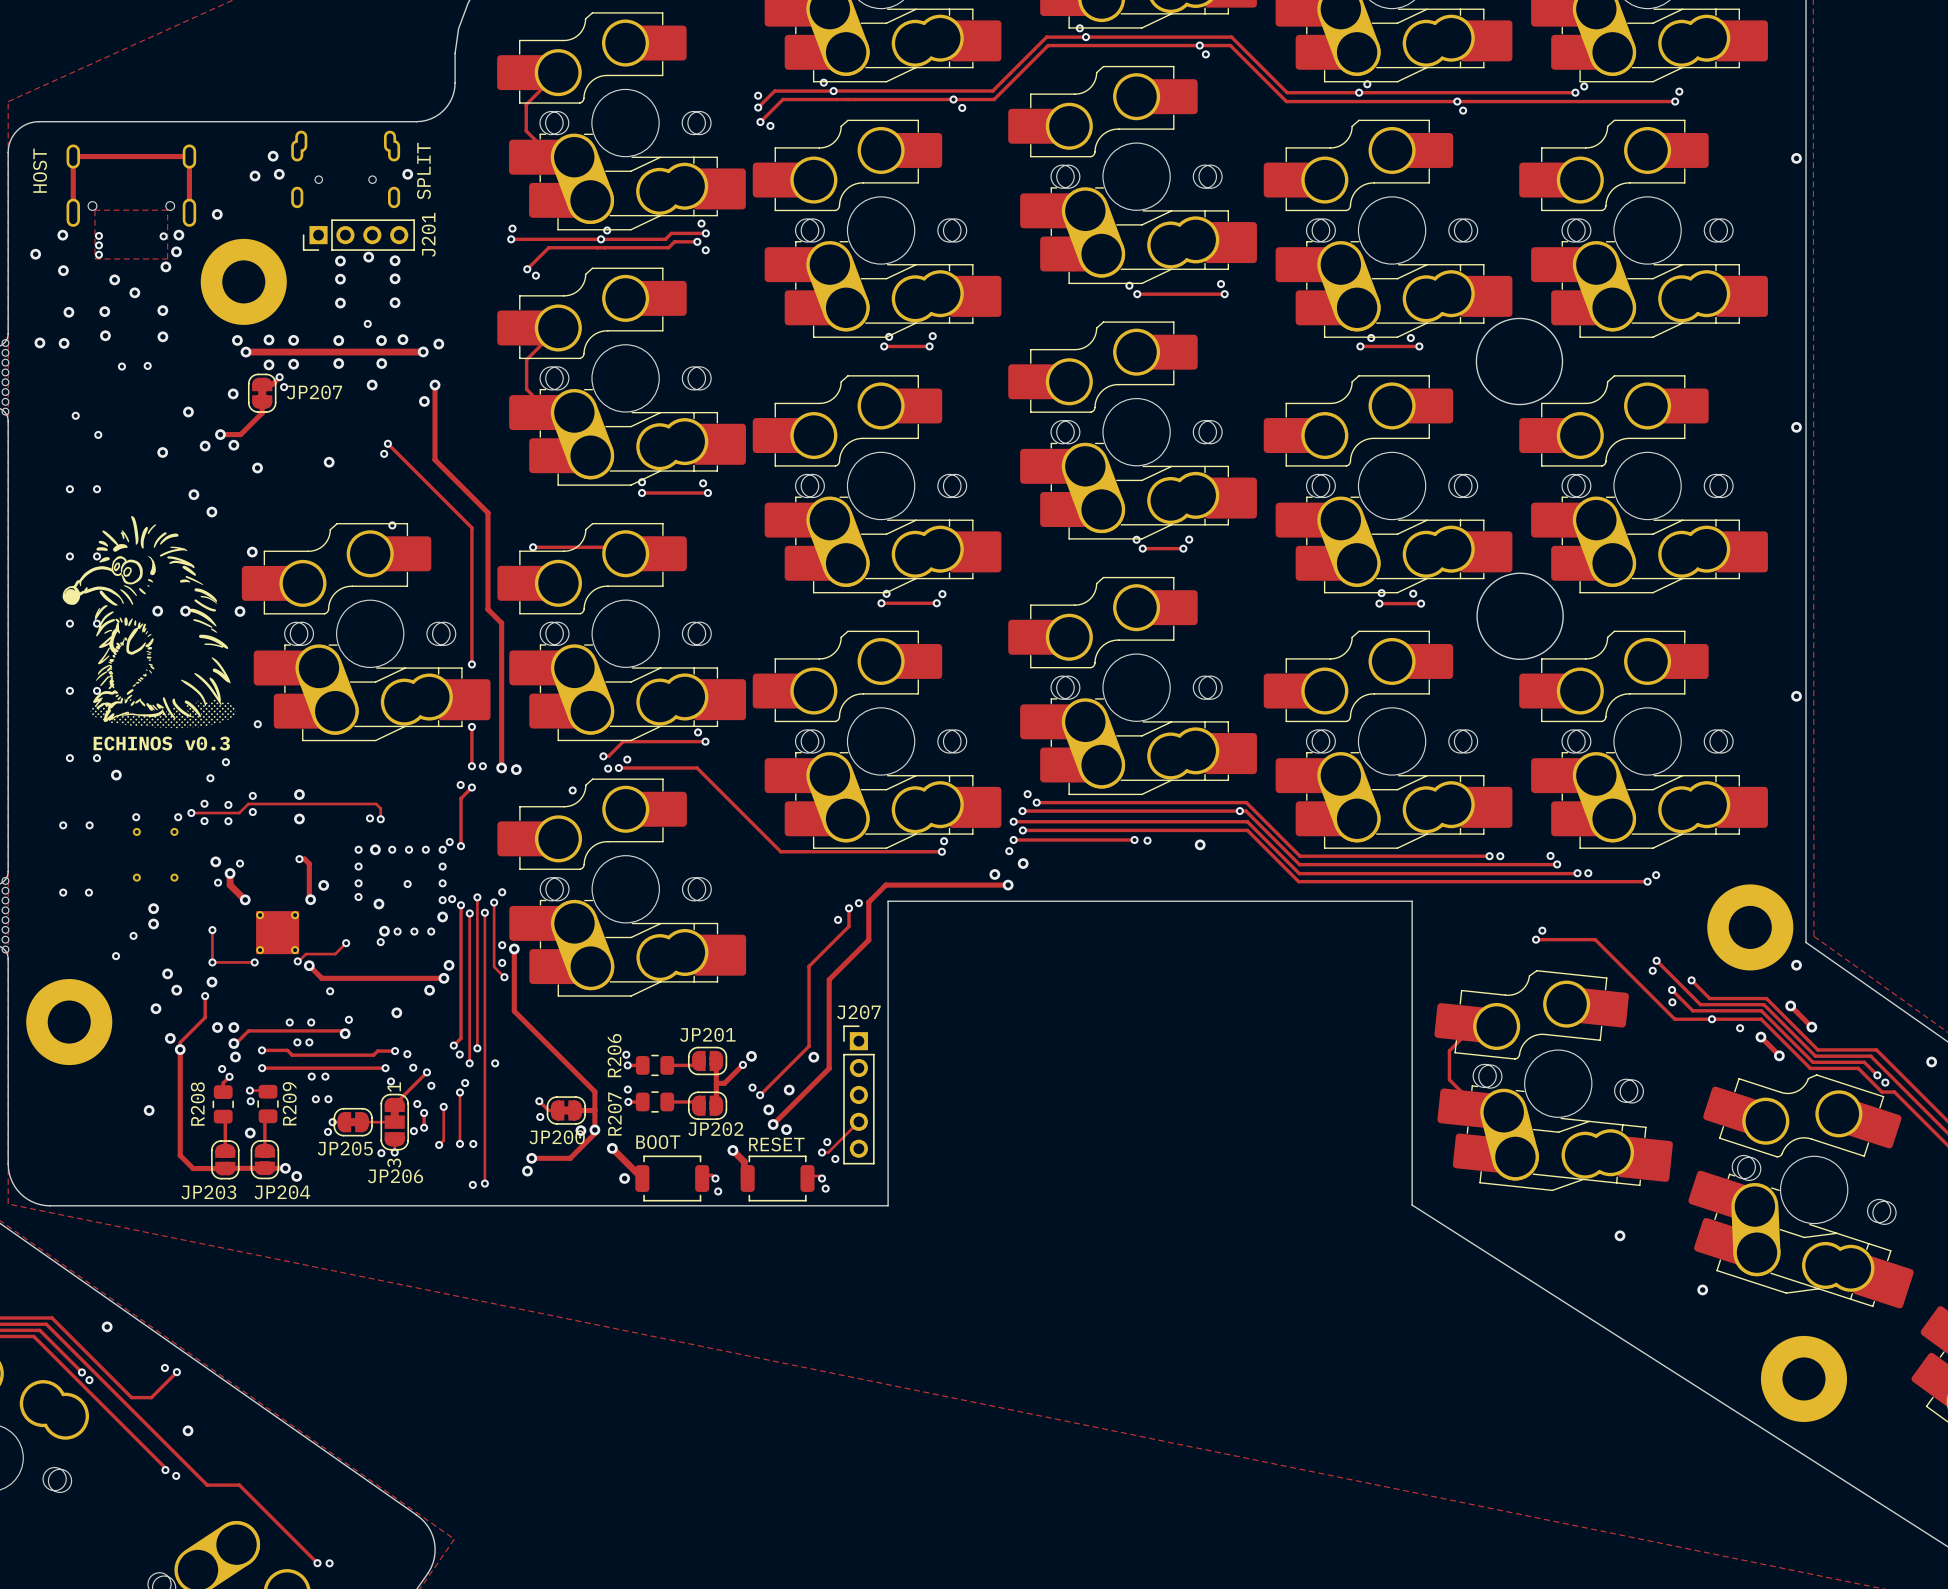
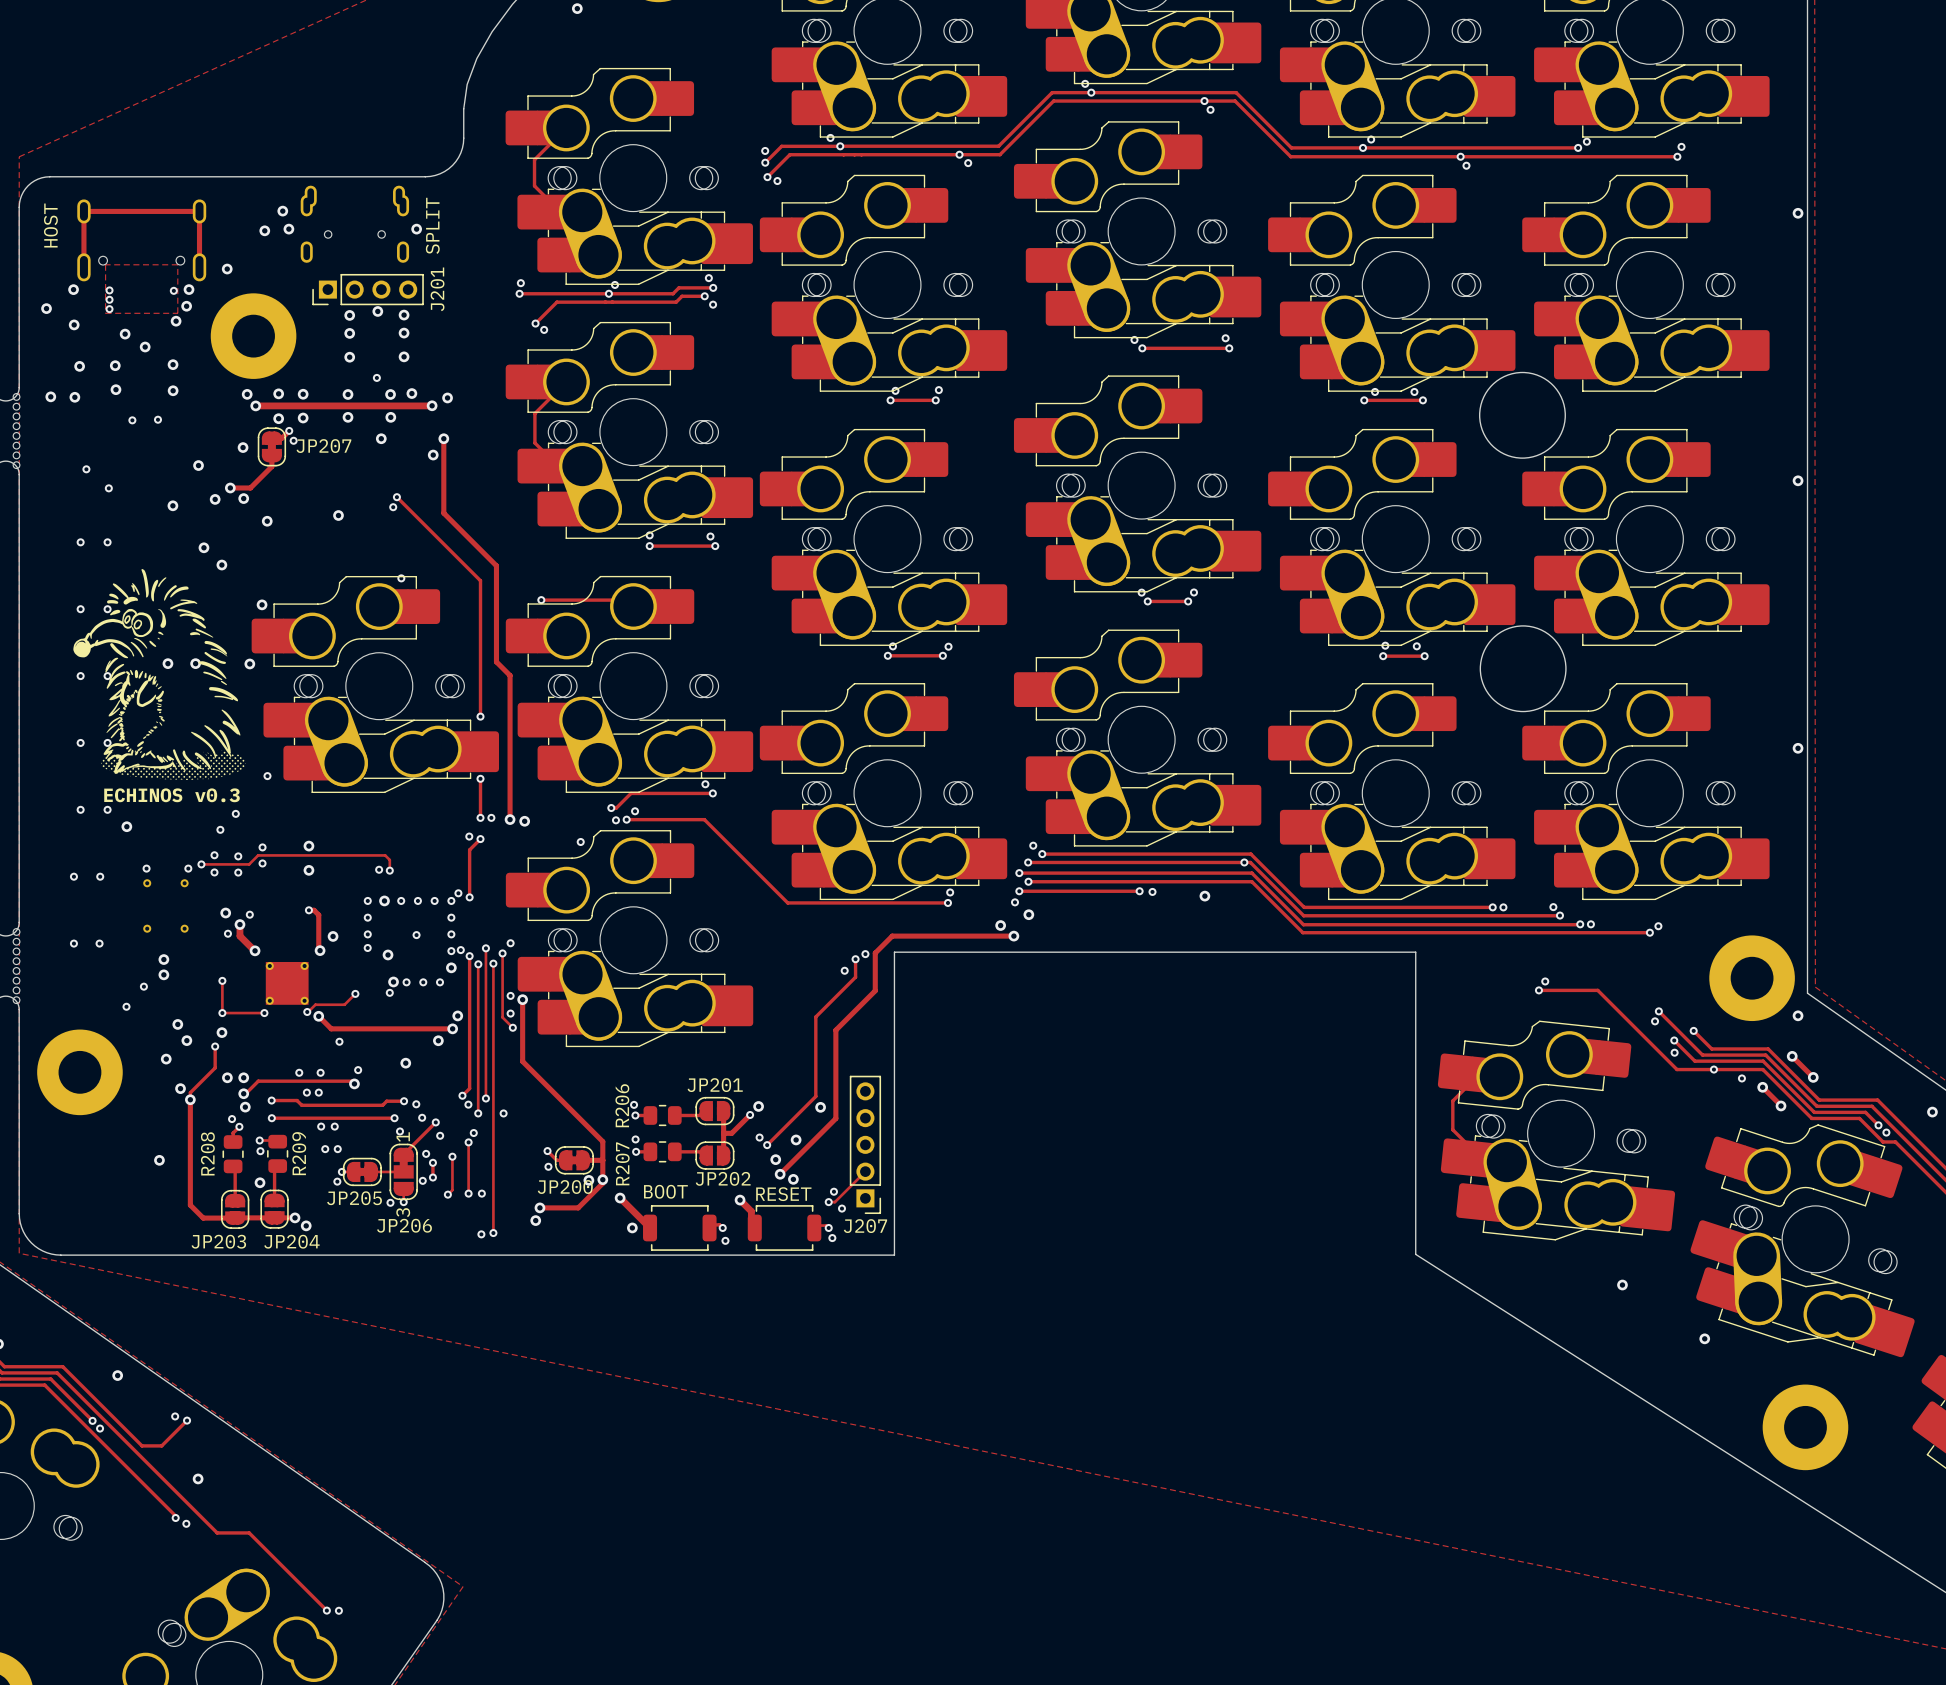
J207 rotation: 0° (858, 1094) -> 180° (865, 1144)

